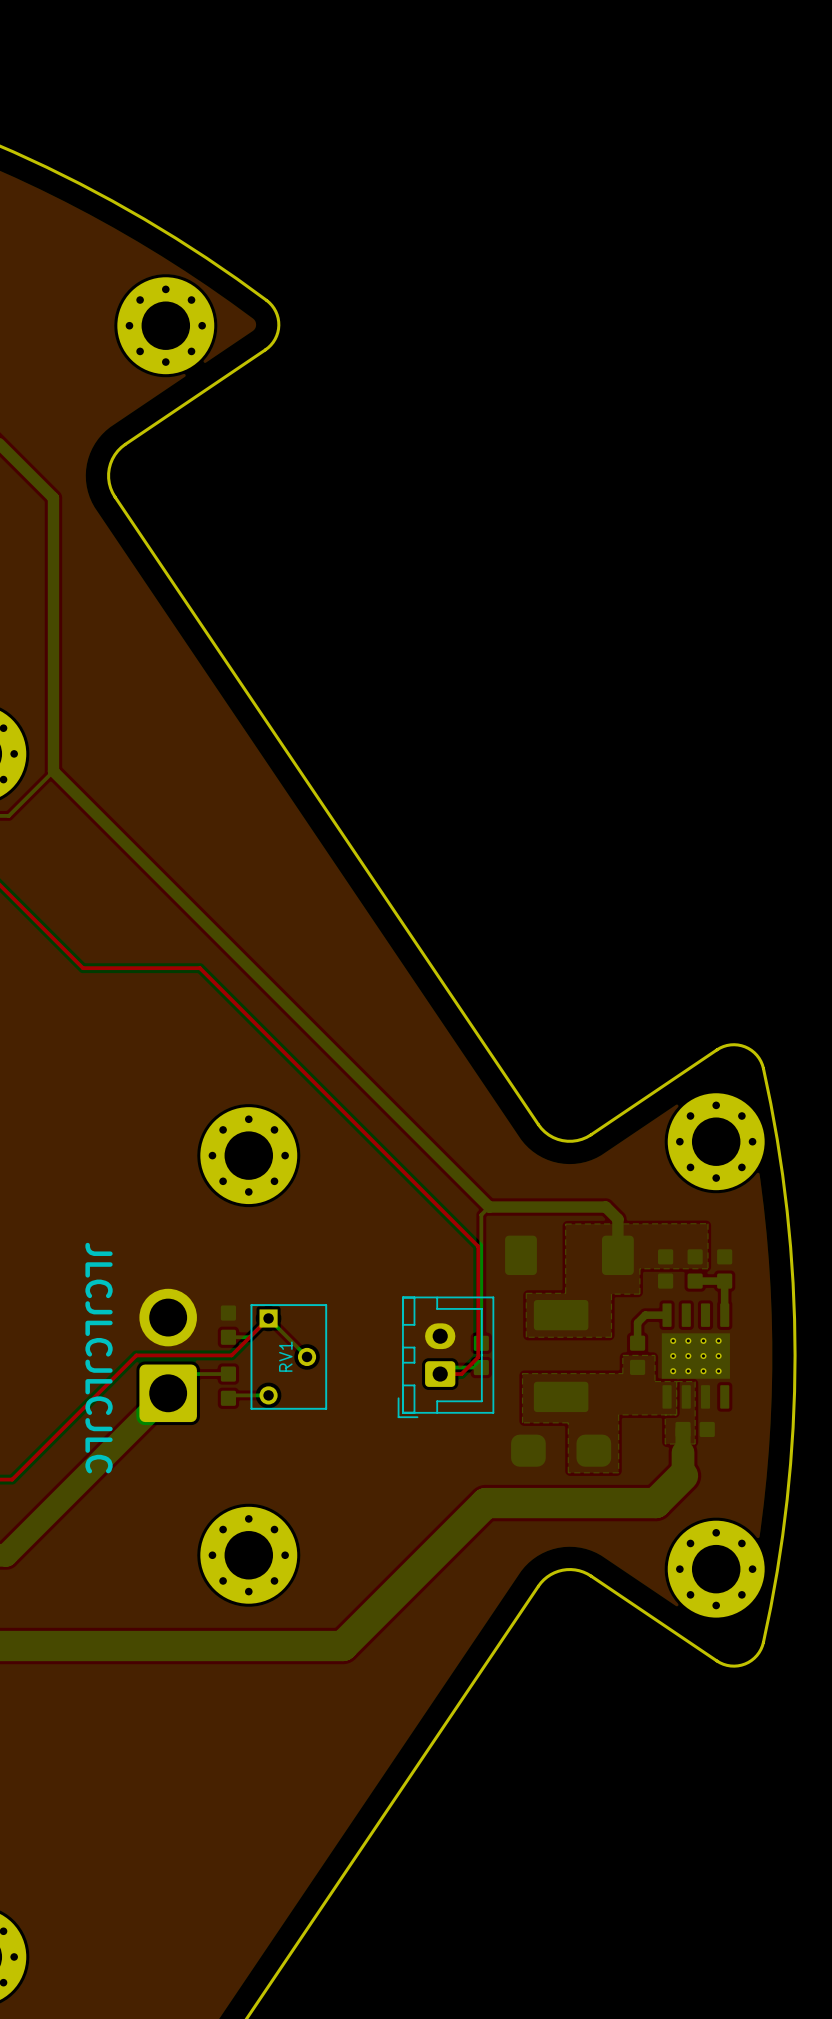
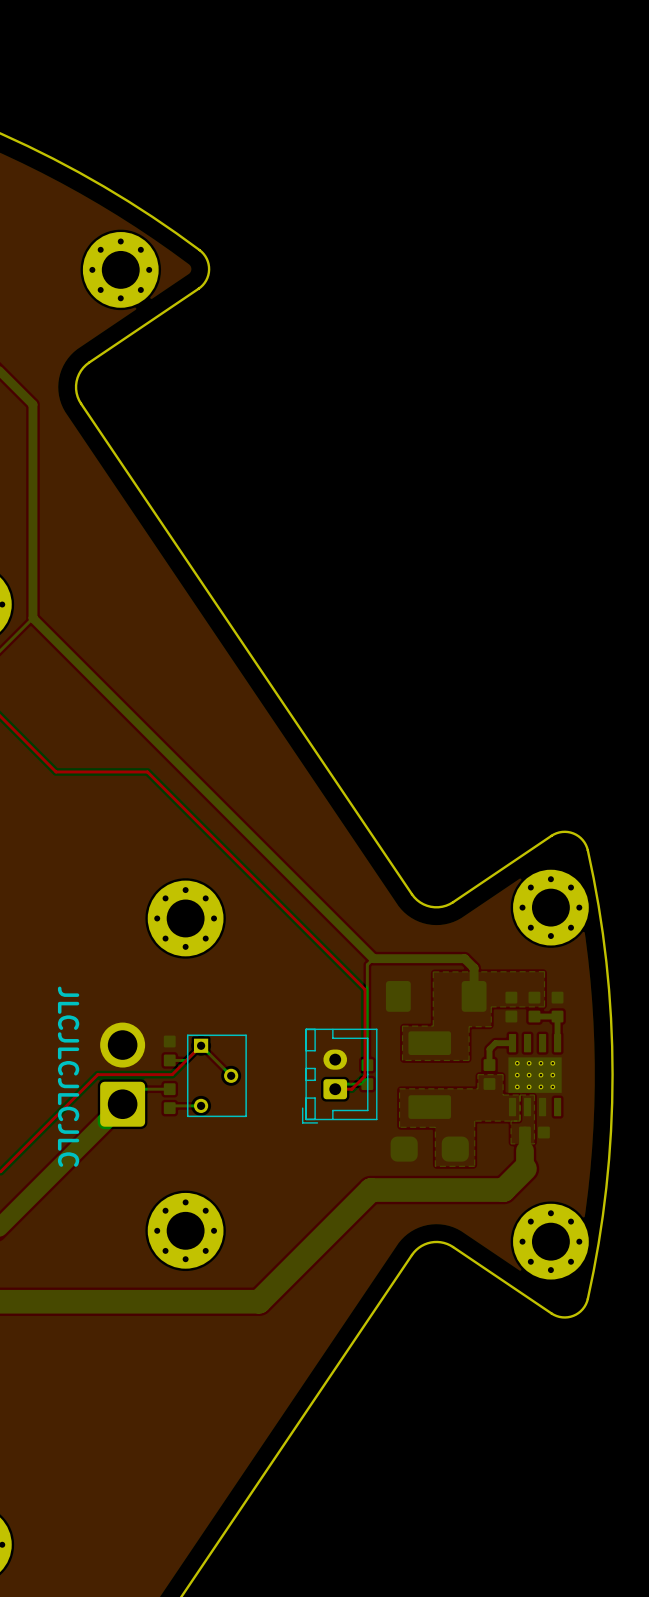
RV1 name: RV1 (285, 1356) -> none

